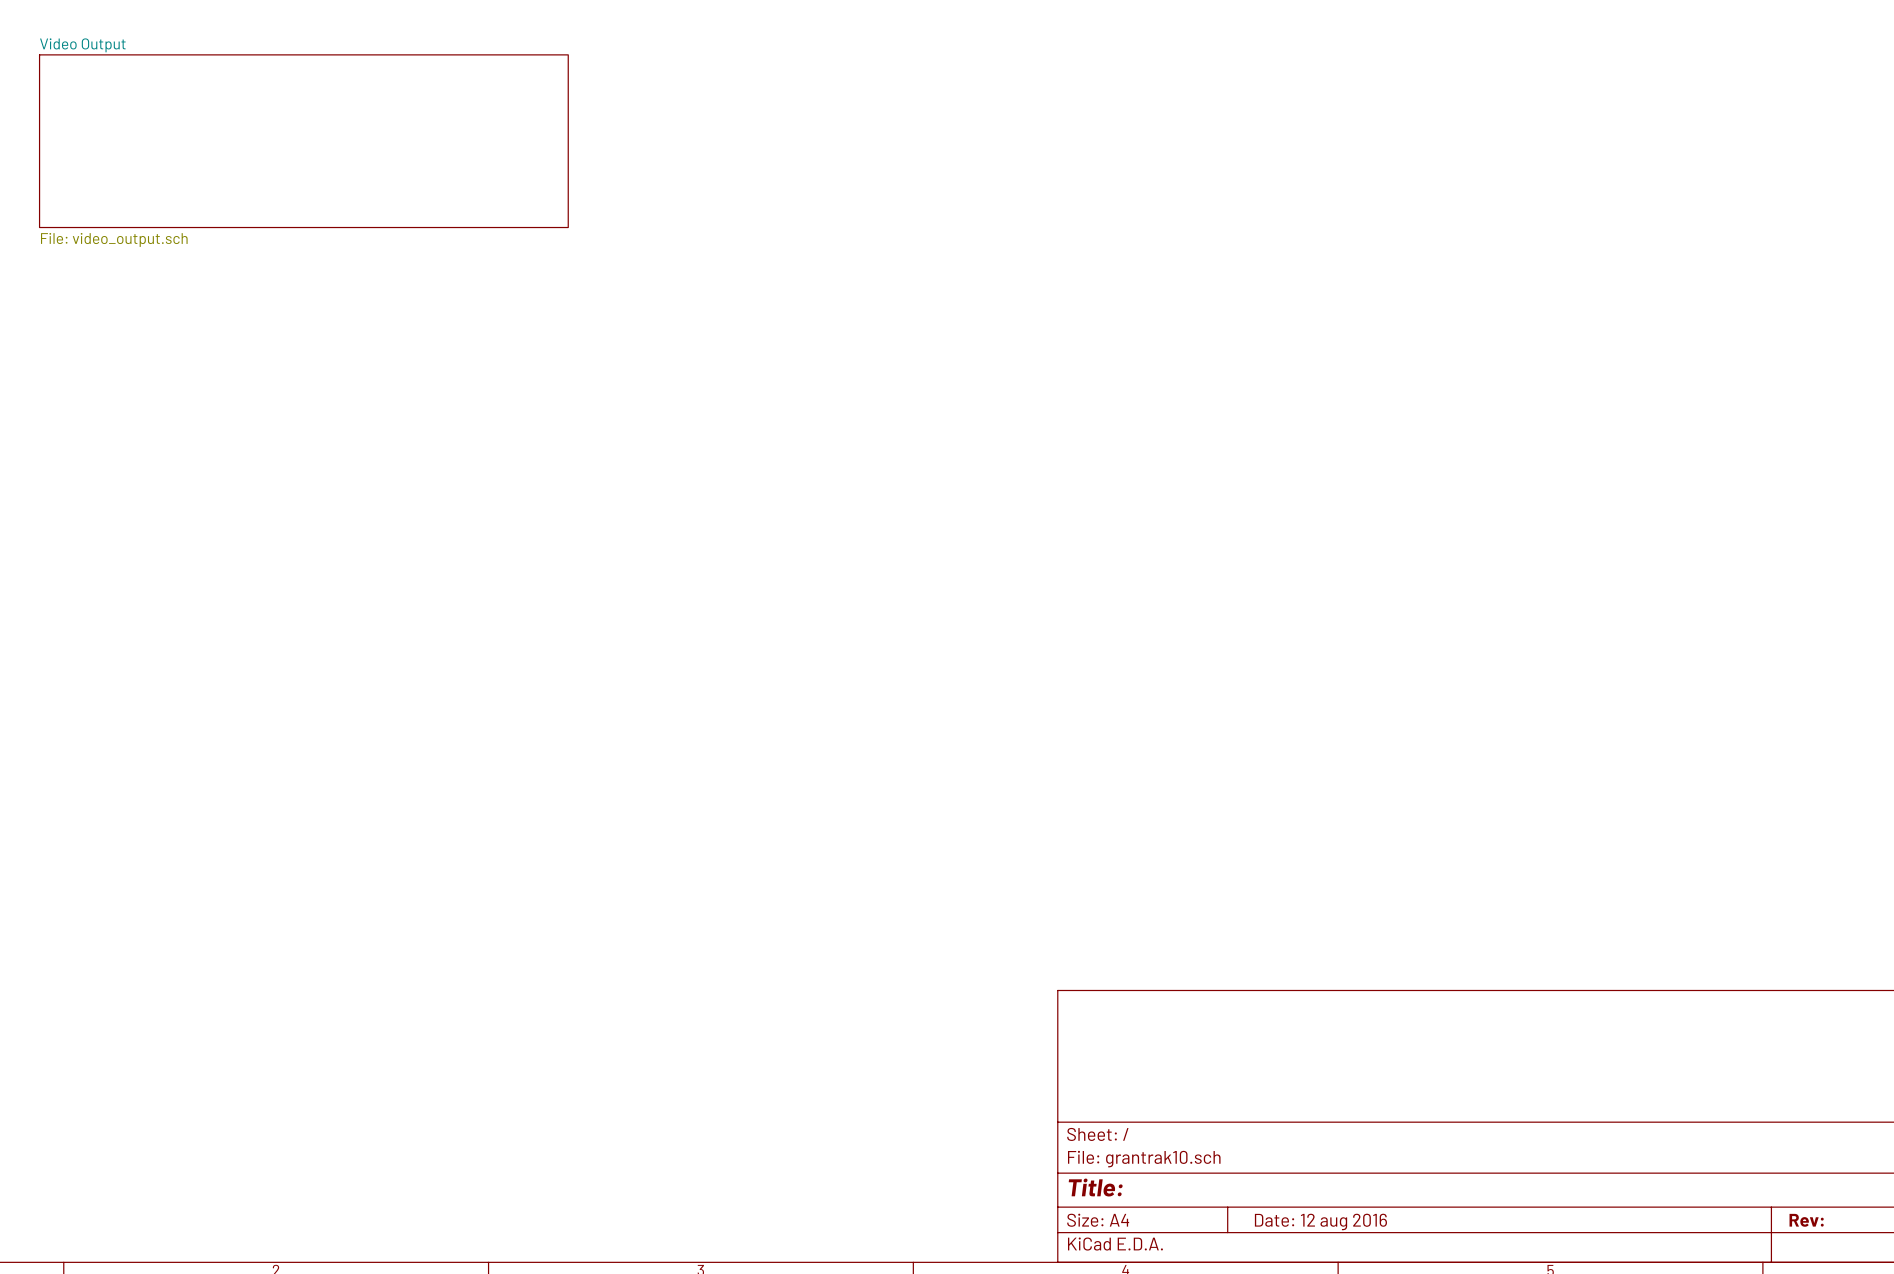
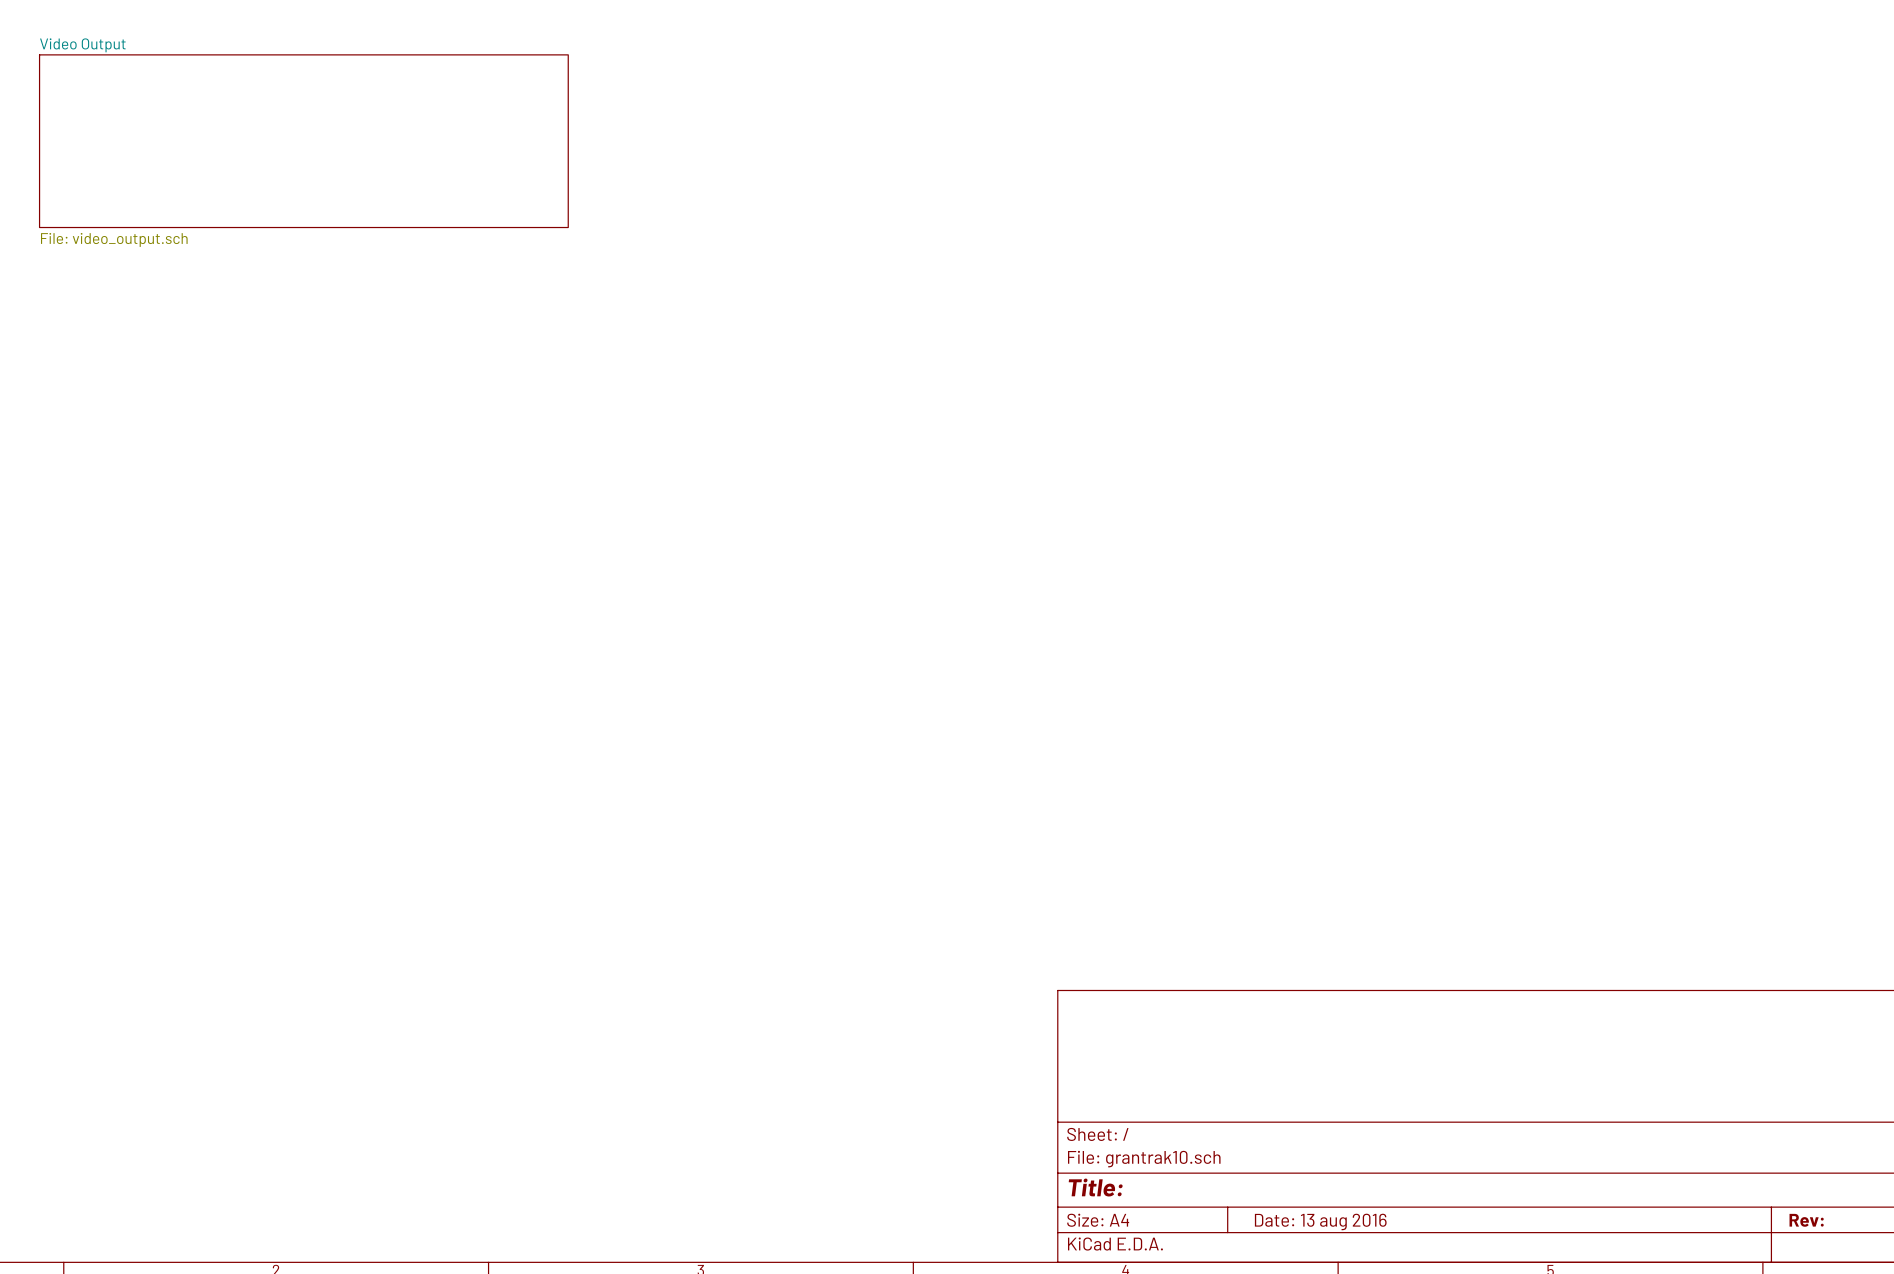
title block: Date: 12 aug 2016 (1320, 1221) -> Date: 13 aug 2016 (1320, 1221)

